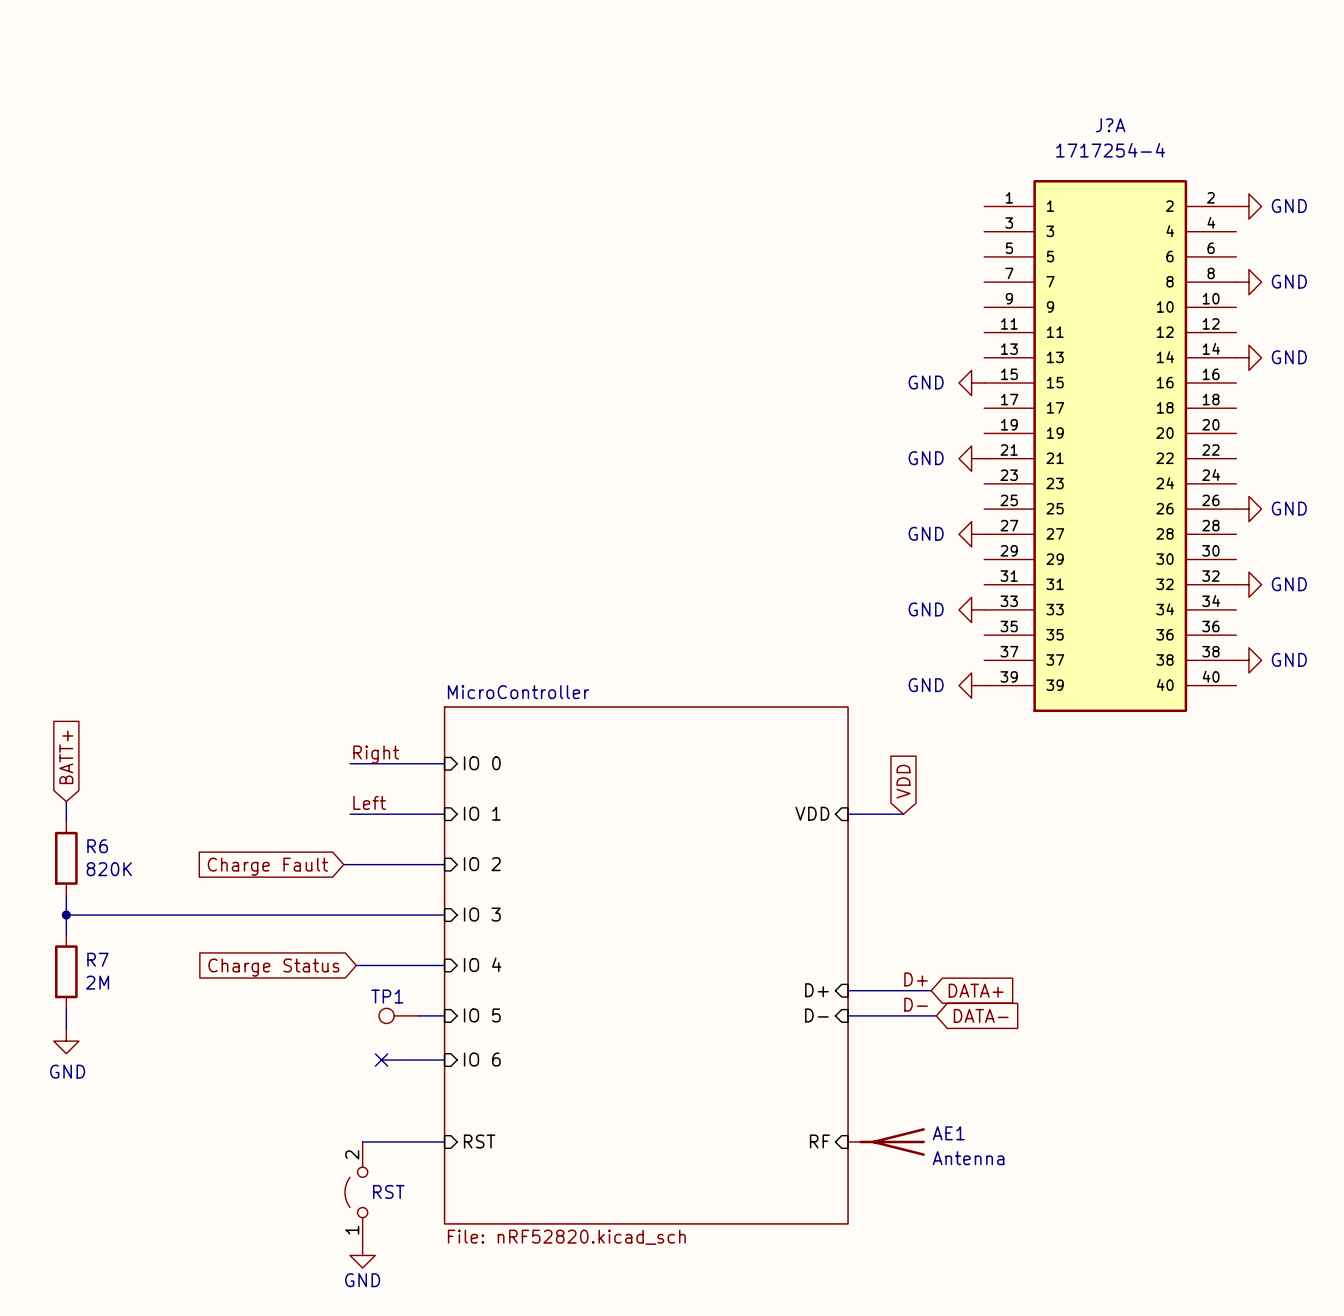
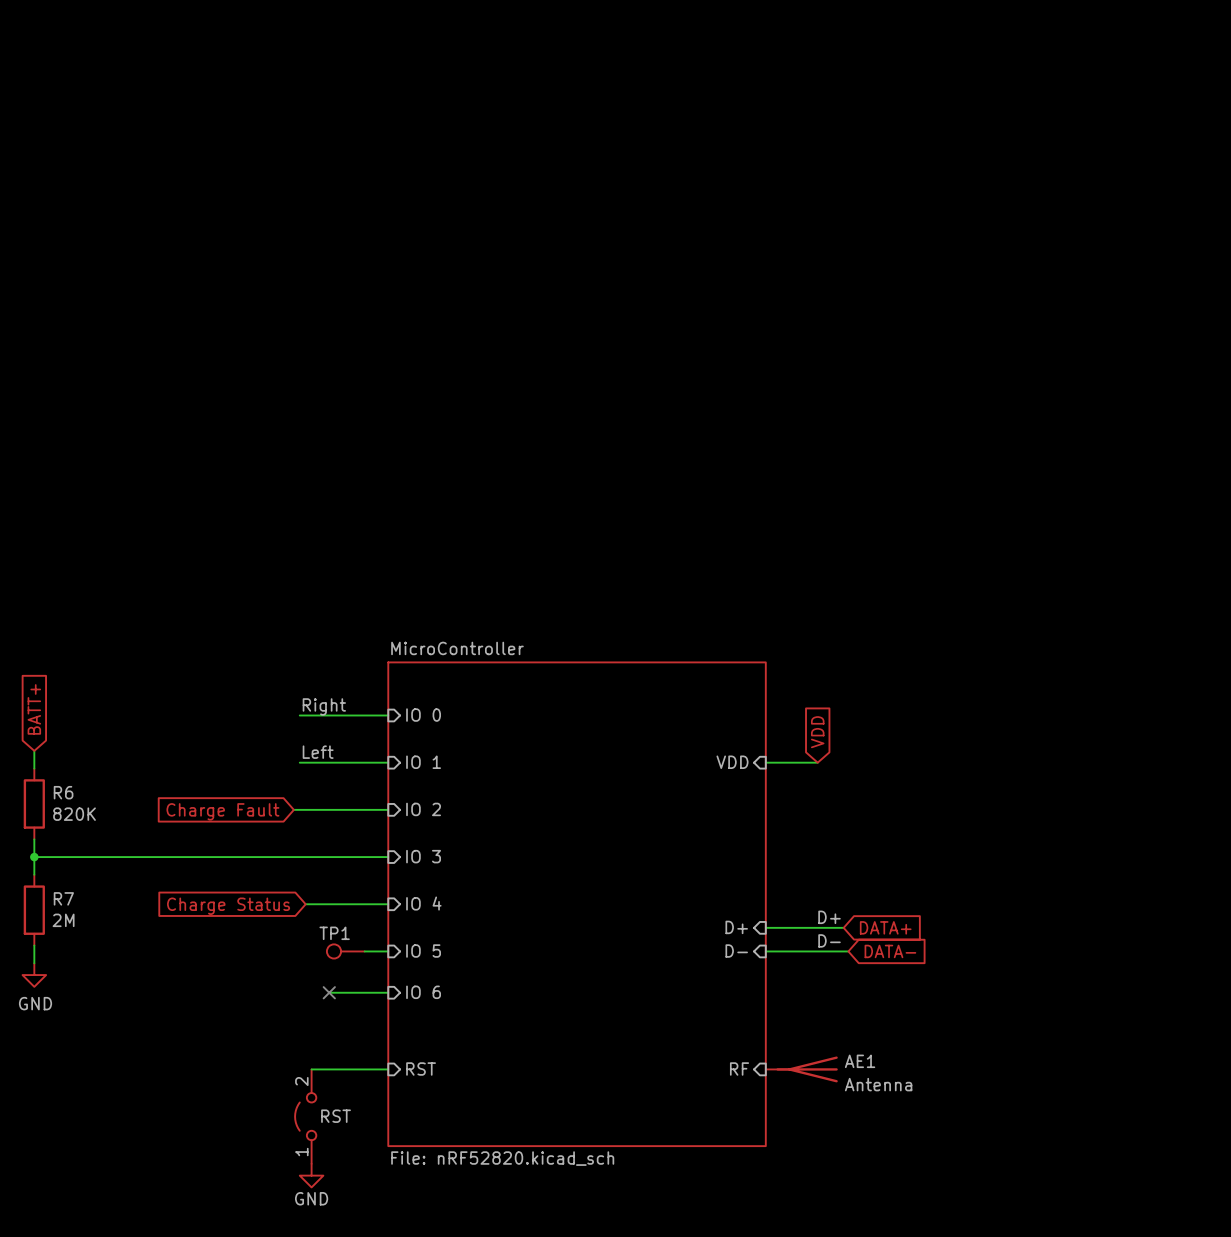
power symbol: GND (1248, 206) -> none
power symbol: GND (1248, 282) -> none
power symbol: GND (1248, 357) -> none
power symbol: GND (971, 383) -> none
J?A: 1717254-4 (1110, 446) -> none
power symbol: GND (971, 458) -> none
power symbol: GND (1248, 509) -> none
power symbol: GND (971, 534) -> none
power symbol: GND (1248, 584) -> none
power symbol: GND (971, 609) -> none
power symbol: GND (1248, 660) -> none
power symbol: GND (971, 685) -> none

